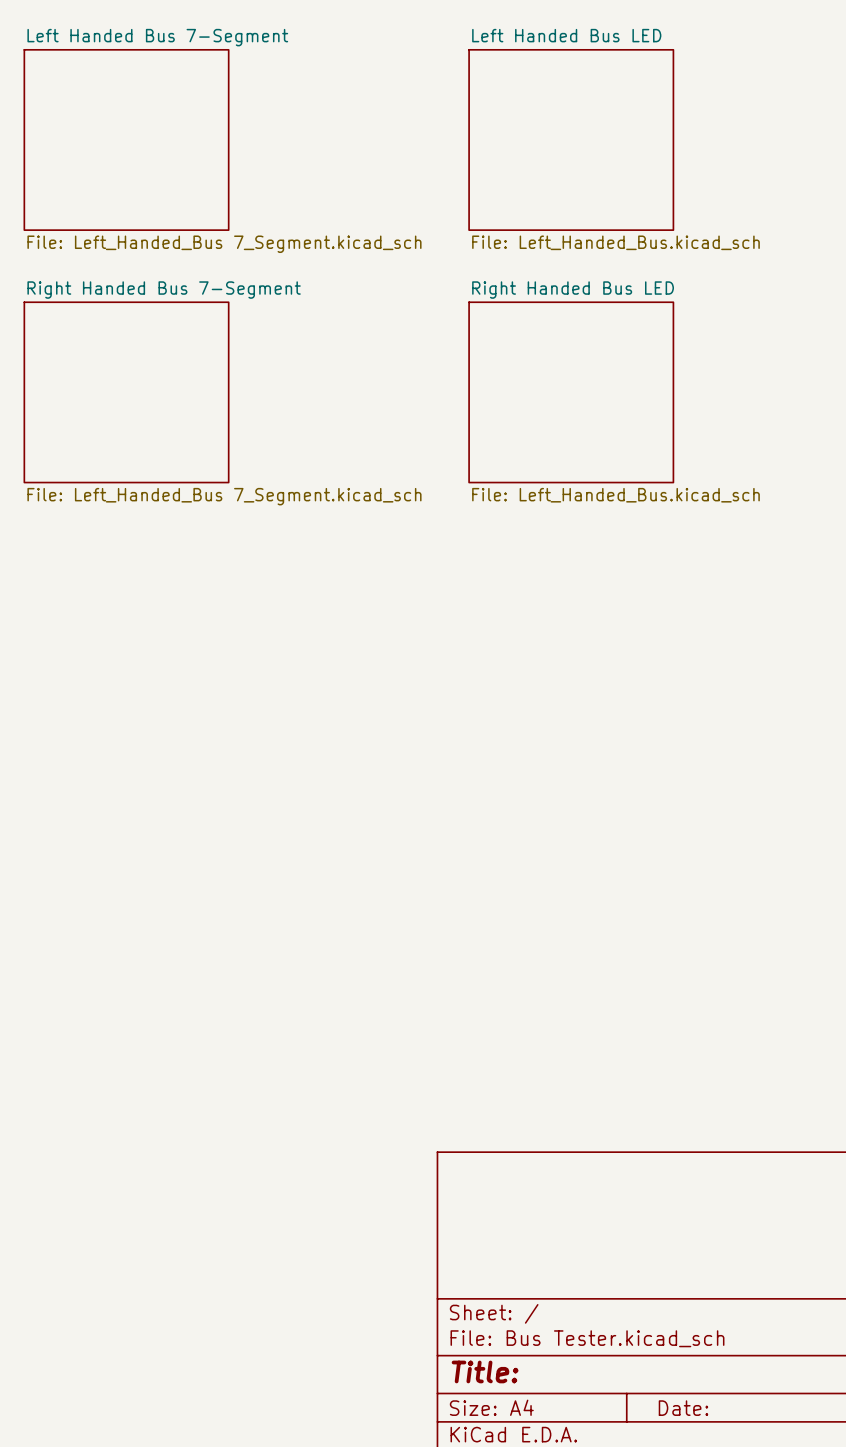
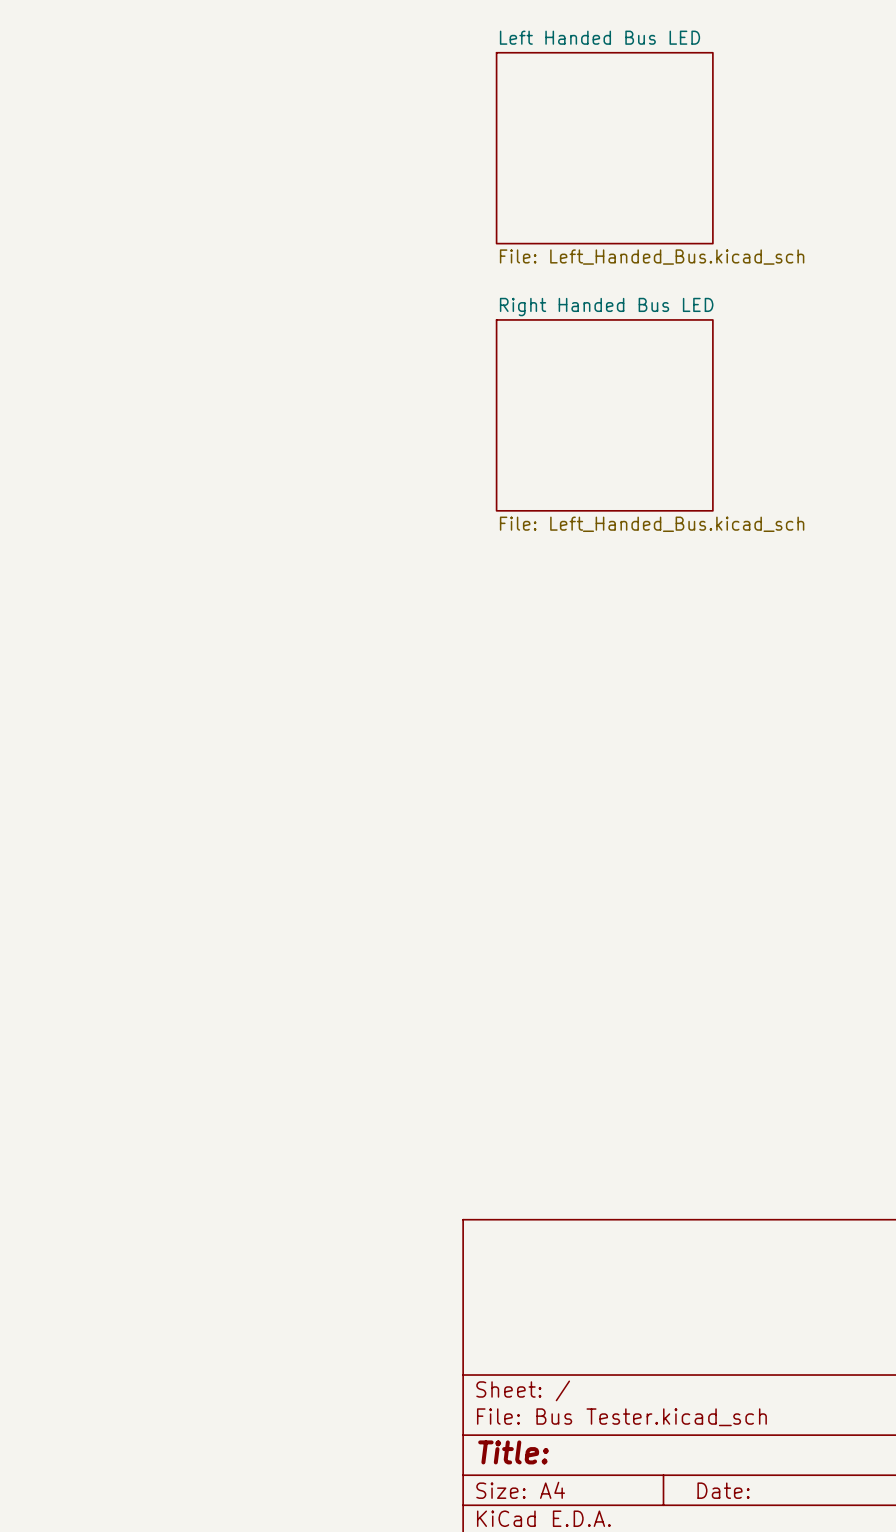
sheet Left Handed Bus 7-Segment: File: Left_Handed_Bus 7_Segment.kicad_sch (126, 139) -> none
sheet Right Handed Bus 7-Segment: File: Left_Handed_Bus 7_Segment.kicad_sch (126, 392) -> none

